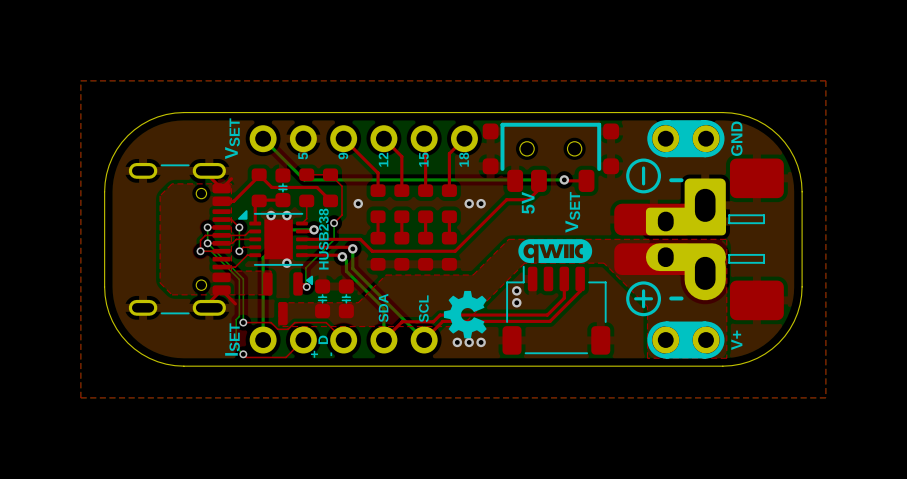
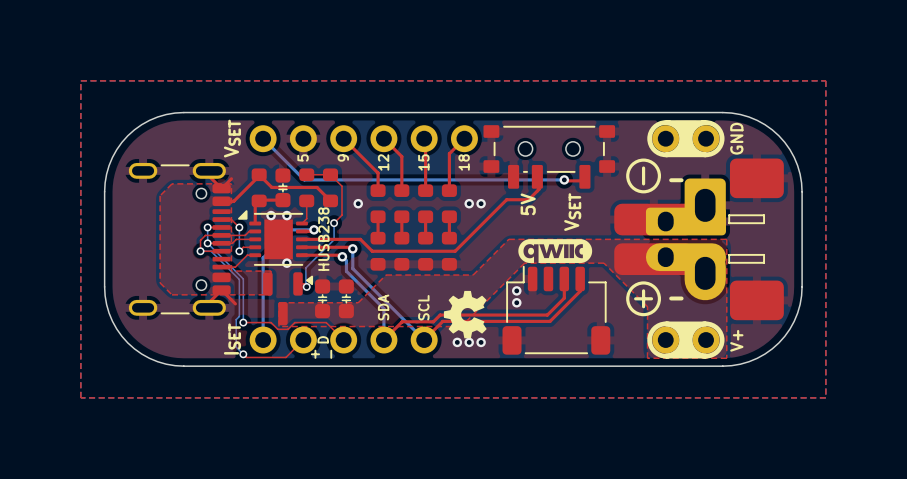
part footprint: [482, 122, 620, 192] -> [483, 125, 616, 189]

